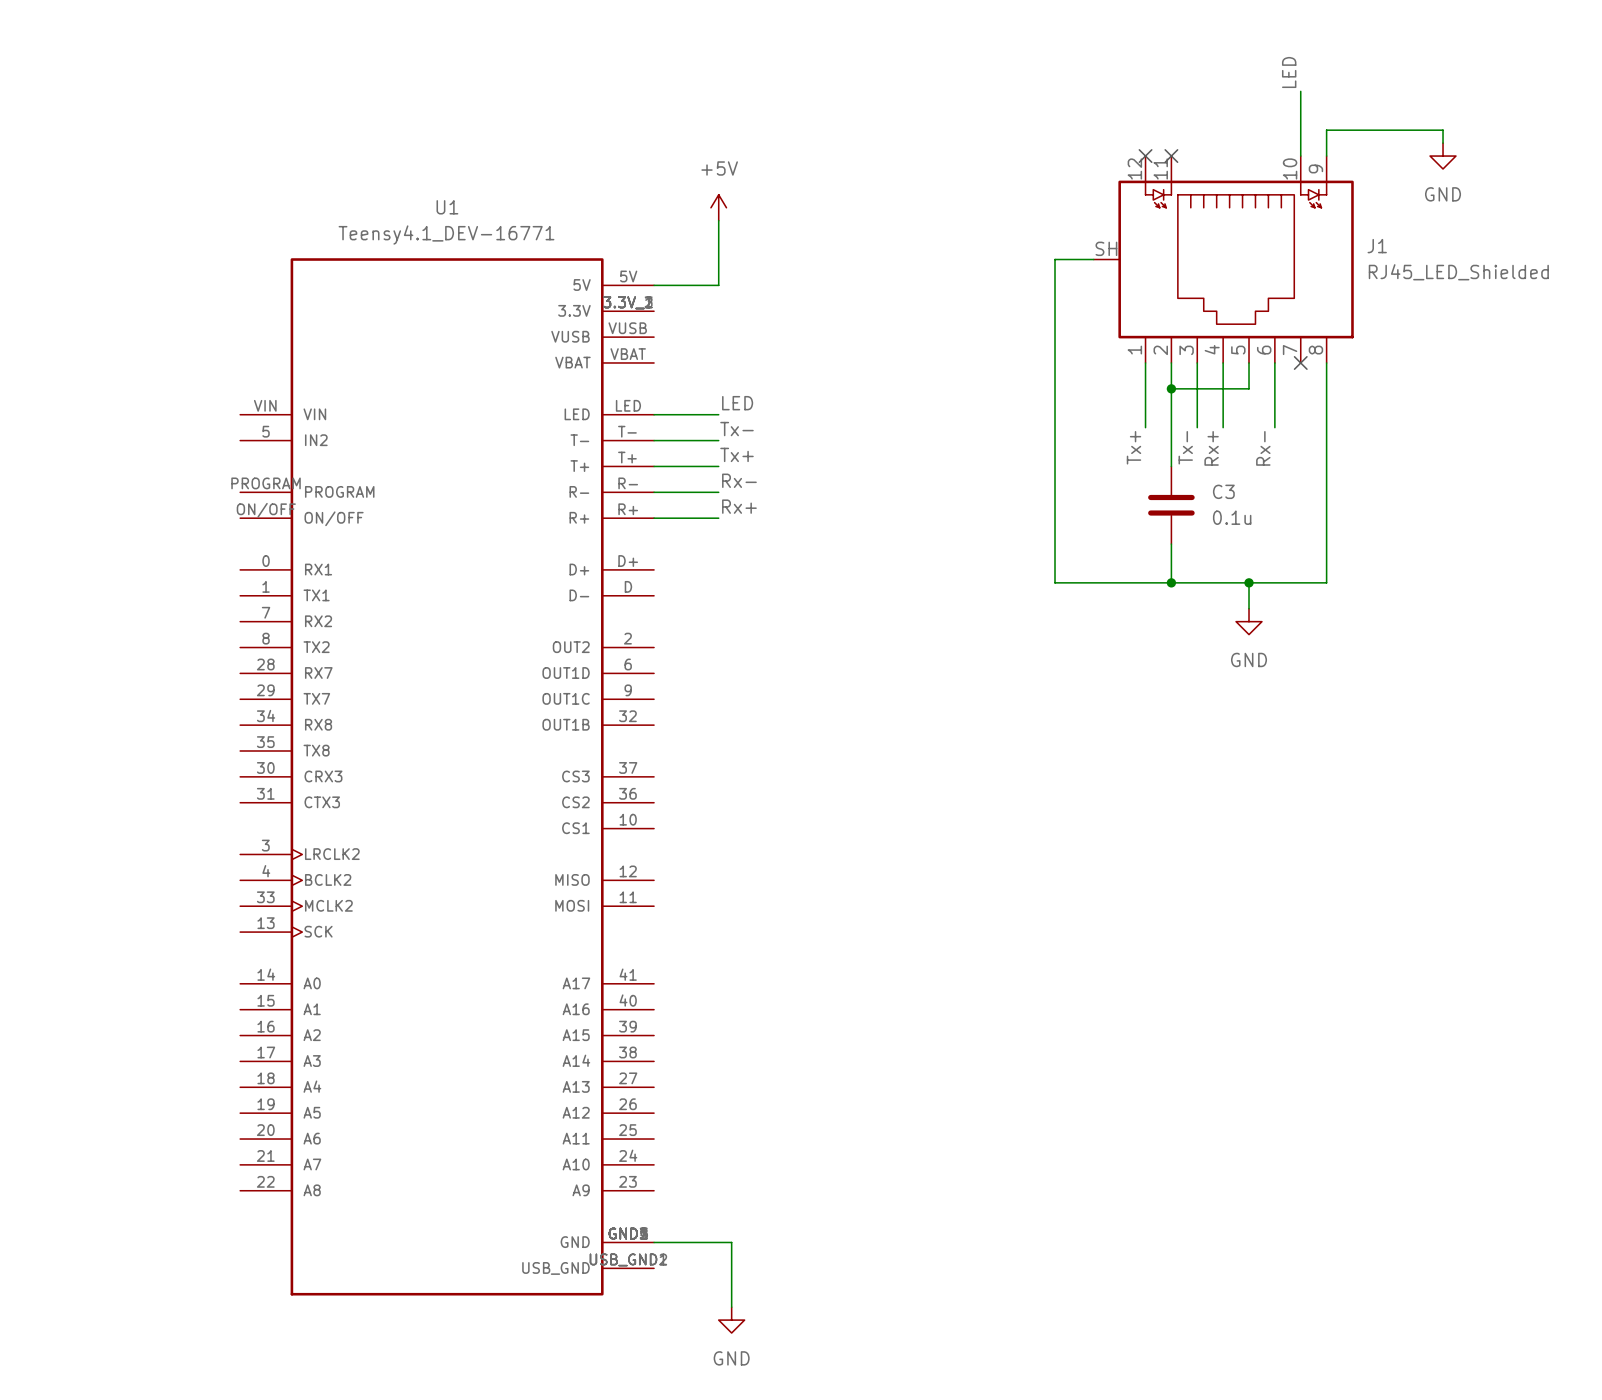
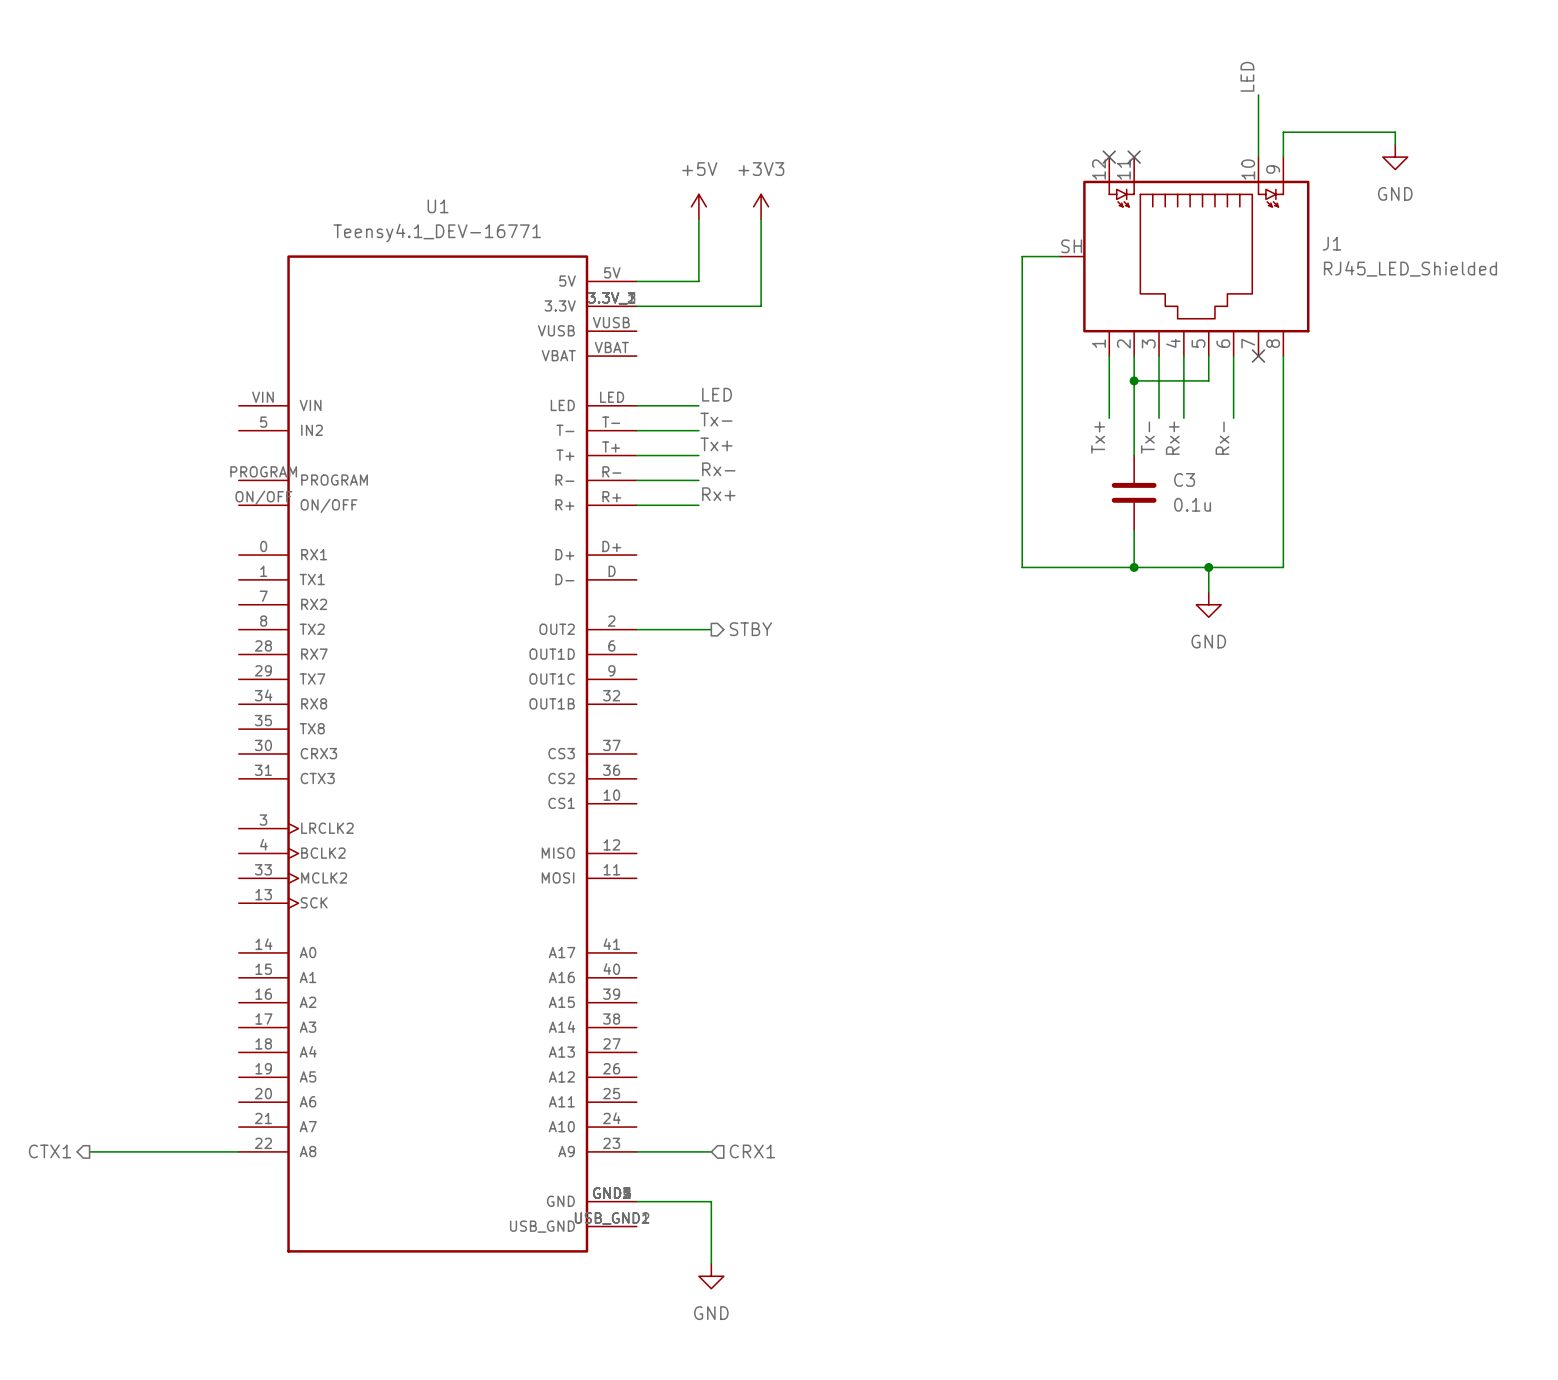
power symbol: none -> +3V3 (761, 206)
wire: none -> (761, 219) (761, 306) (636, 306)
wire: none -> (636, 629) (711, 629)
hierarchical label: none -> STBY (750, 629)
hierarchical label: none -> CTX1 (50, 1151)
wire: none -> (89, 1151) (238, 1151)
wire: none -> (636, 1151) (711, 1151)
hierarchical label: none -> CRX1 (752, 1151)

